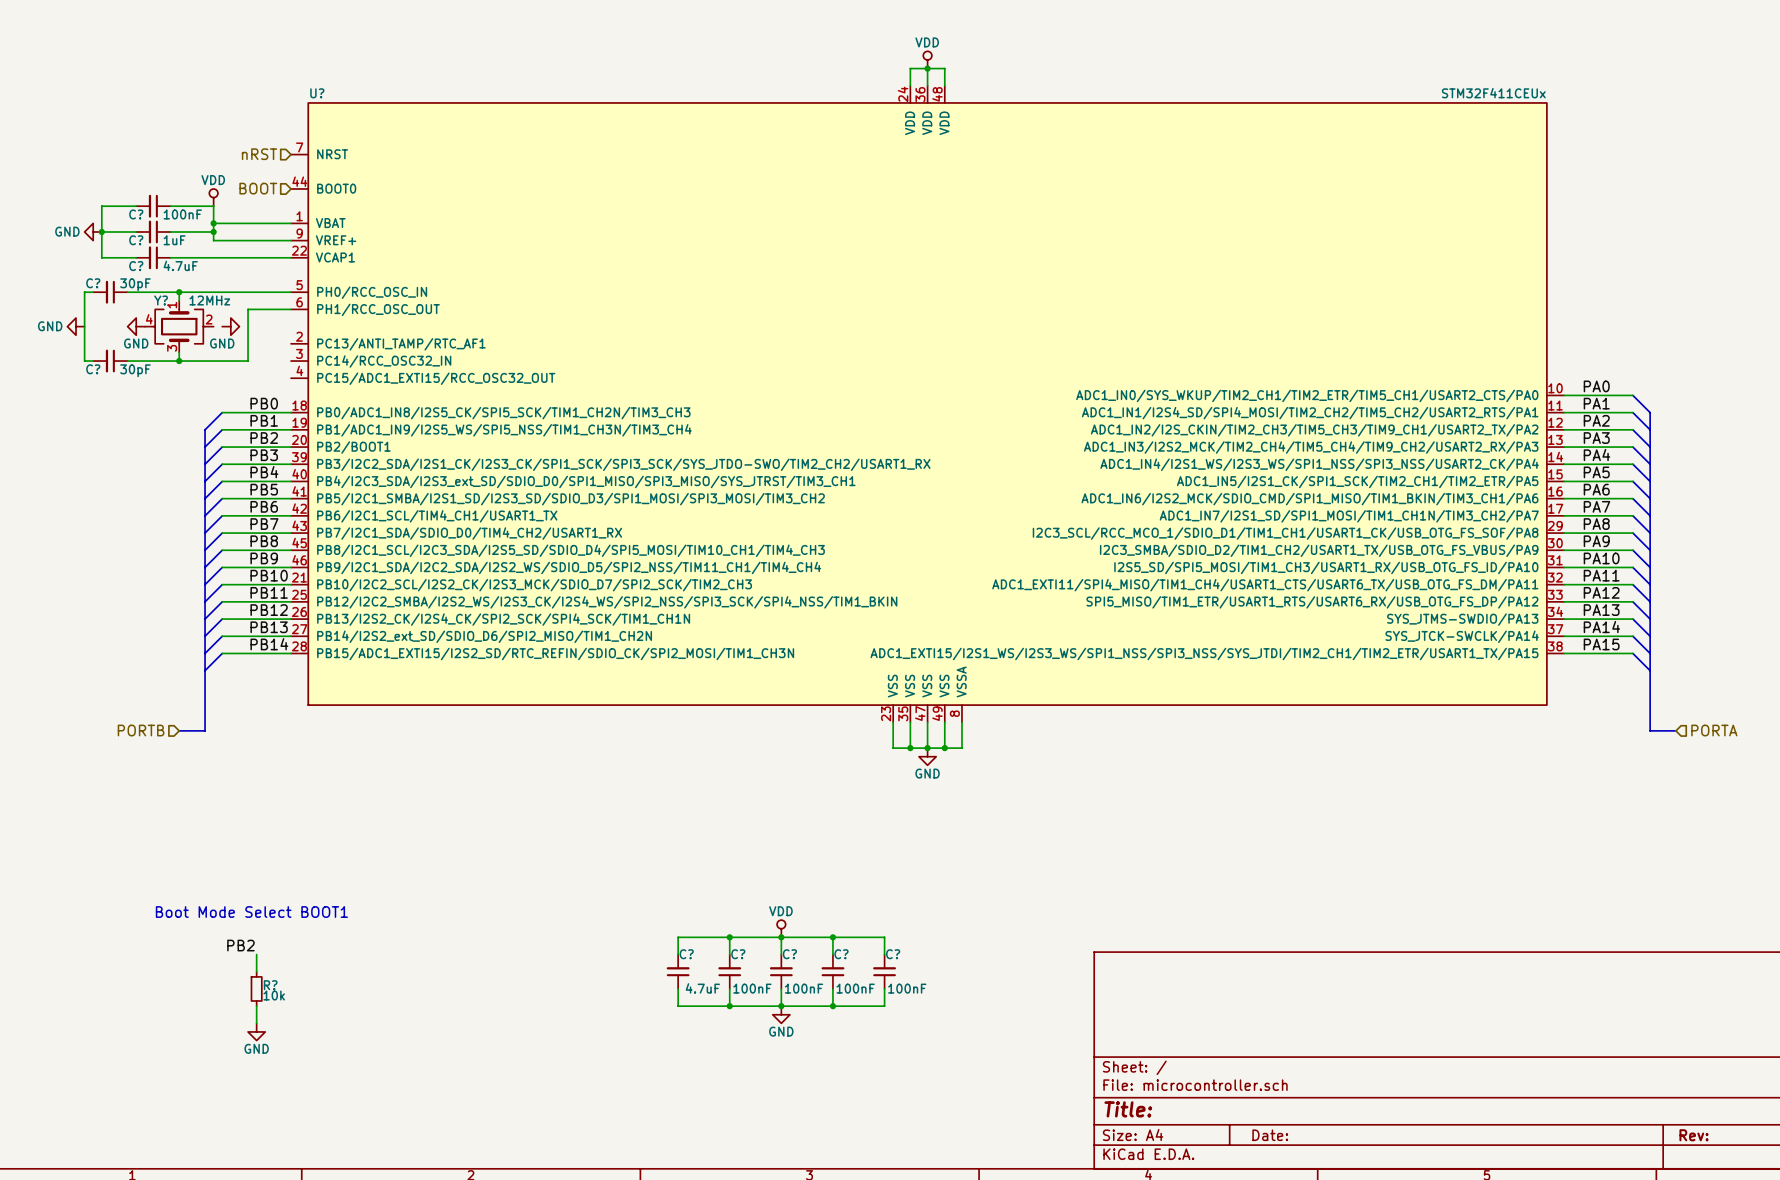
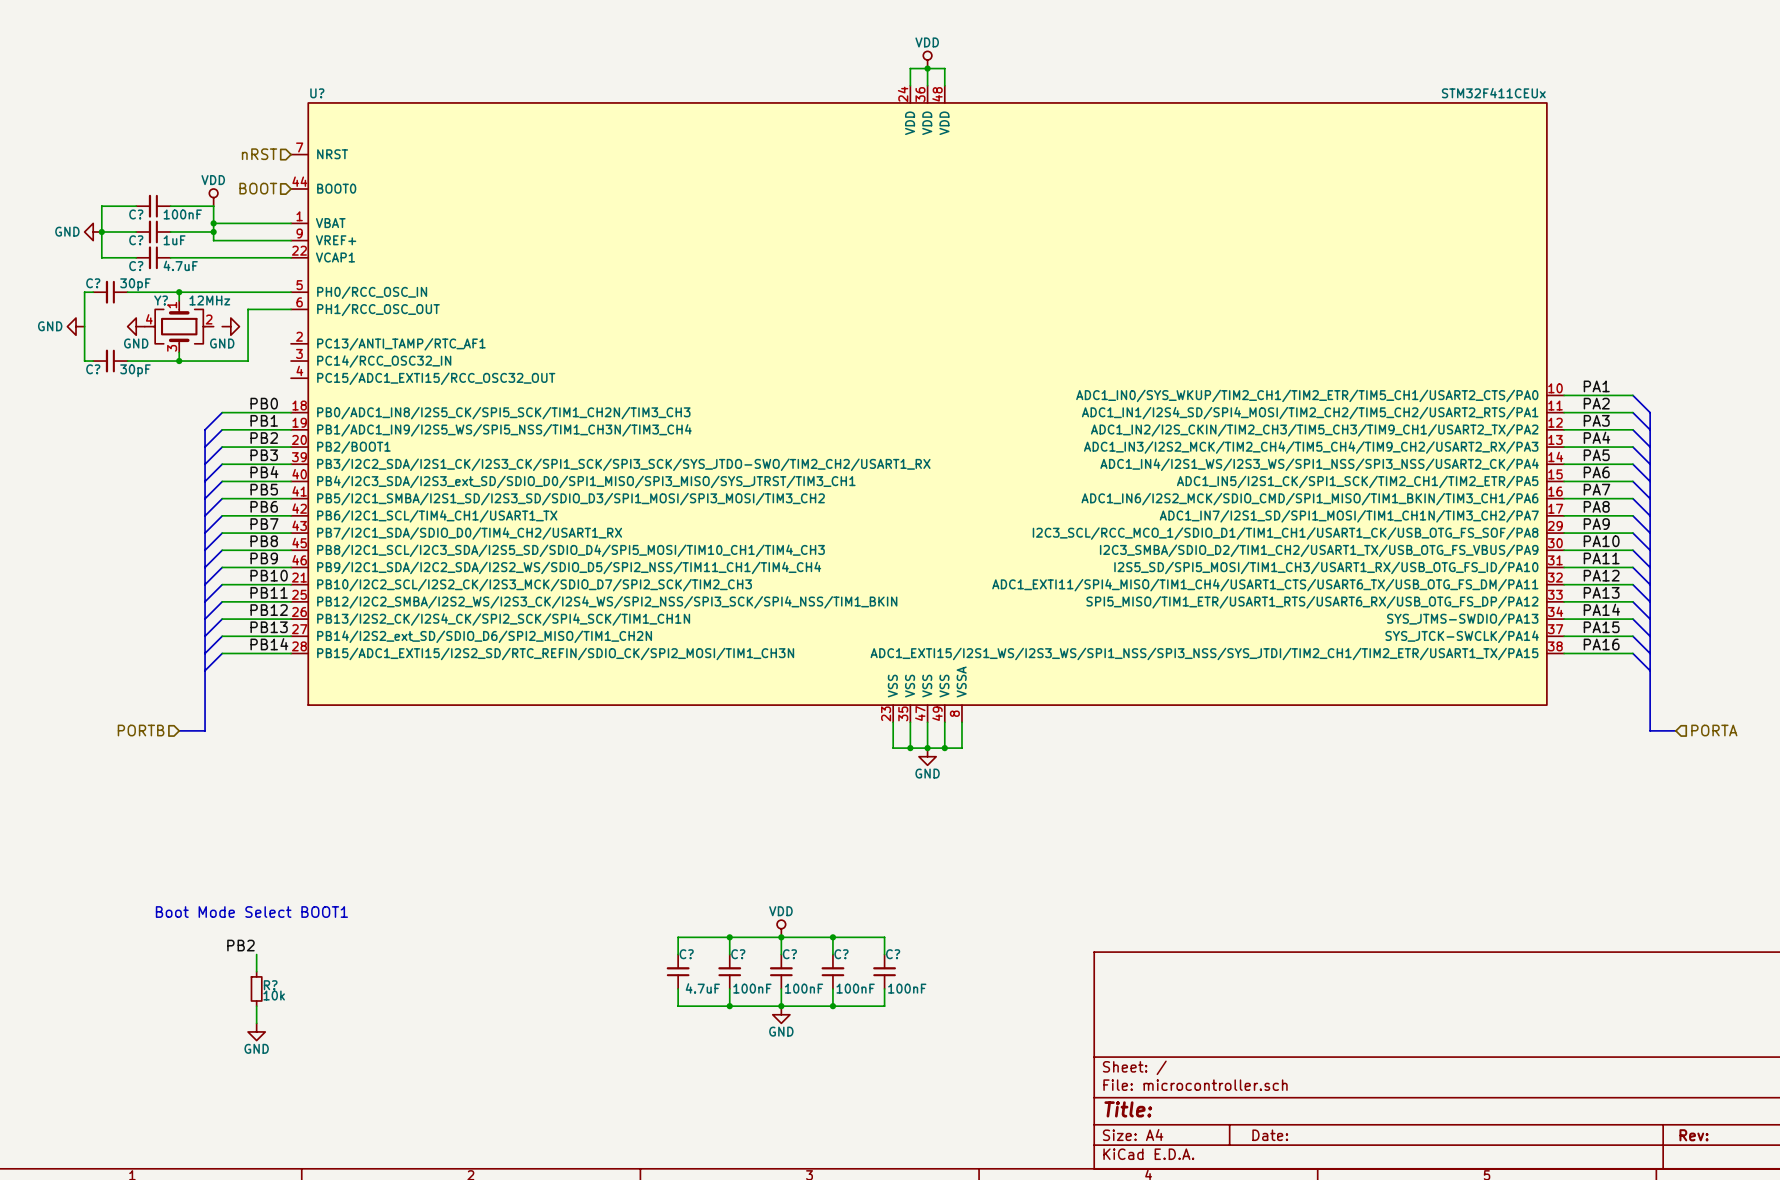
label: PA0 (1596, 386) -> PA1 (1596, 386)
label: PA1 (1596, 403) -> PA2 (1596, 403)
label: PA2 (1596, 420) -> PA3 (1596, 420)
label: PA3 (1596, 438) -> PA4 (1596, 437)
label: PA4 (1596, 454) -> PA5 (1596, 455)
label: PA5 (1596, 472) -> PA6 (1596, 472)
label: PA6 (1596, 489) -> PA7 (1596, 489)
label: PA7 (1596, 506) -> PA8 (1596, 506)
label: PA8 (1596, 524) -> PA9 (1596, 524)
label: PA9 (1596, 541) -> PA10 (1601, 541)
label: PA10 (1601, 558) -> PA11 (1601, 558)
label: PA11 (1601, 575) -> PA12 (1601, 575)
label: PA12 (1601, 592) -> PA13 (1601, 592)
label: PA13 (1601, 610) -> PA14 (1601, 609)
label: PA14 (1601, 627) -> PA15 (1601, 627)
label: PA15 (1601, 644) -> PA16 (1601, 644)

